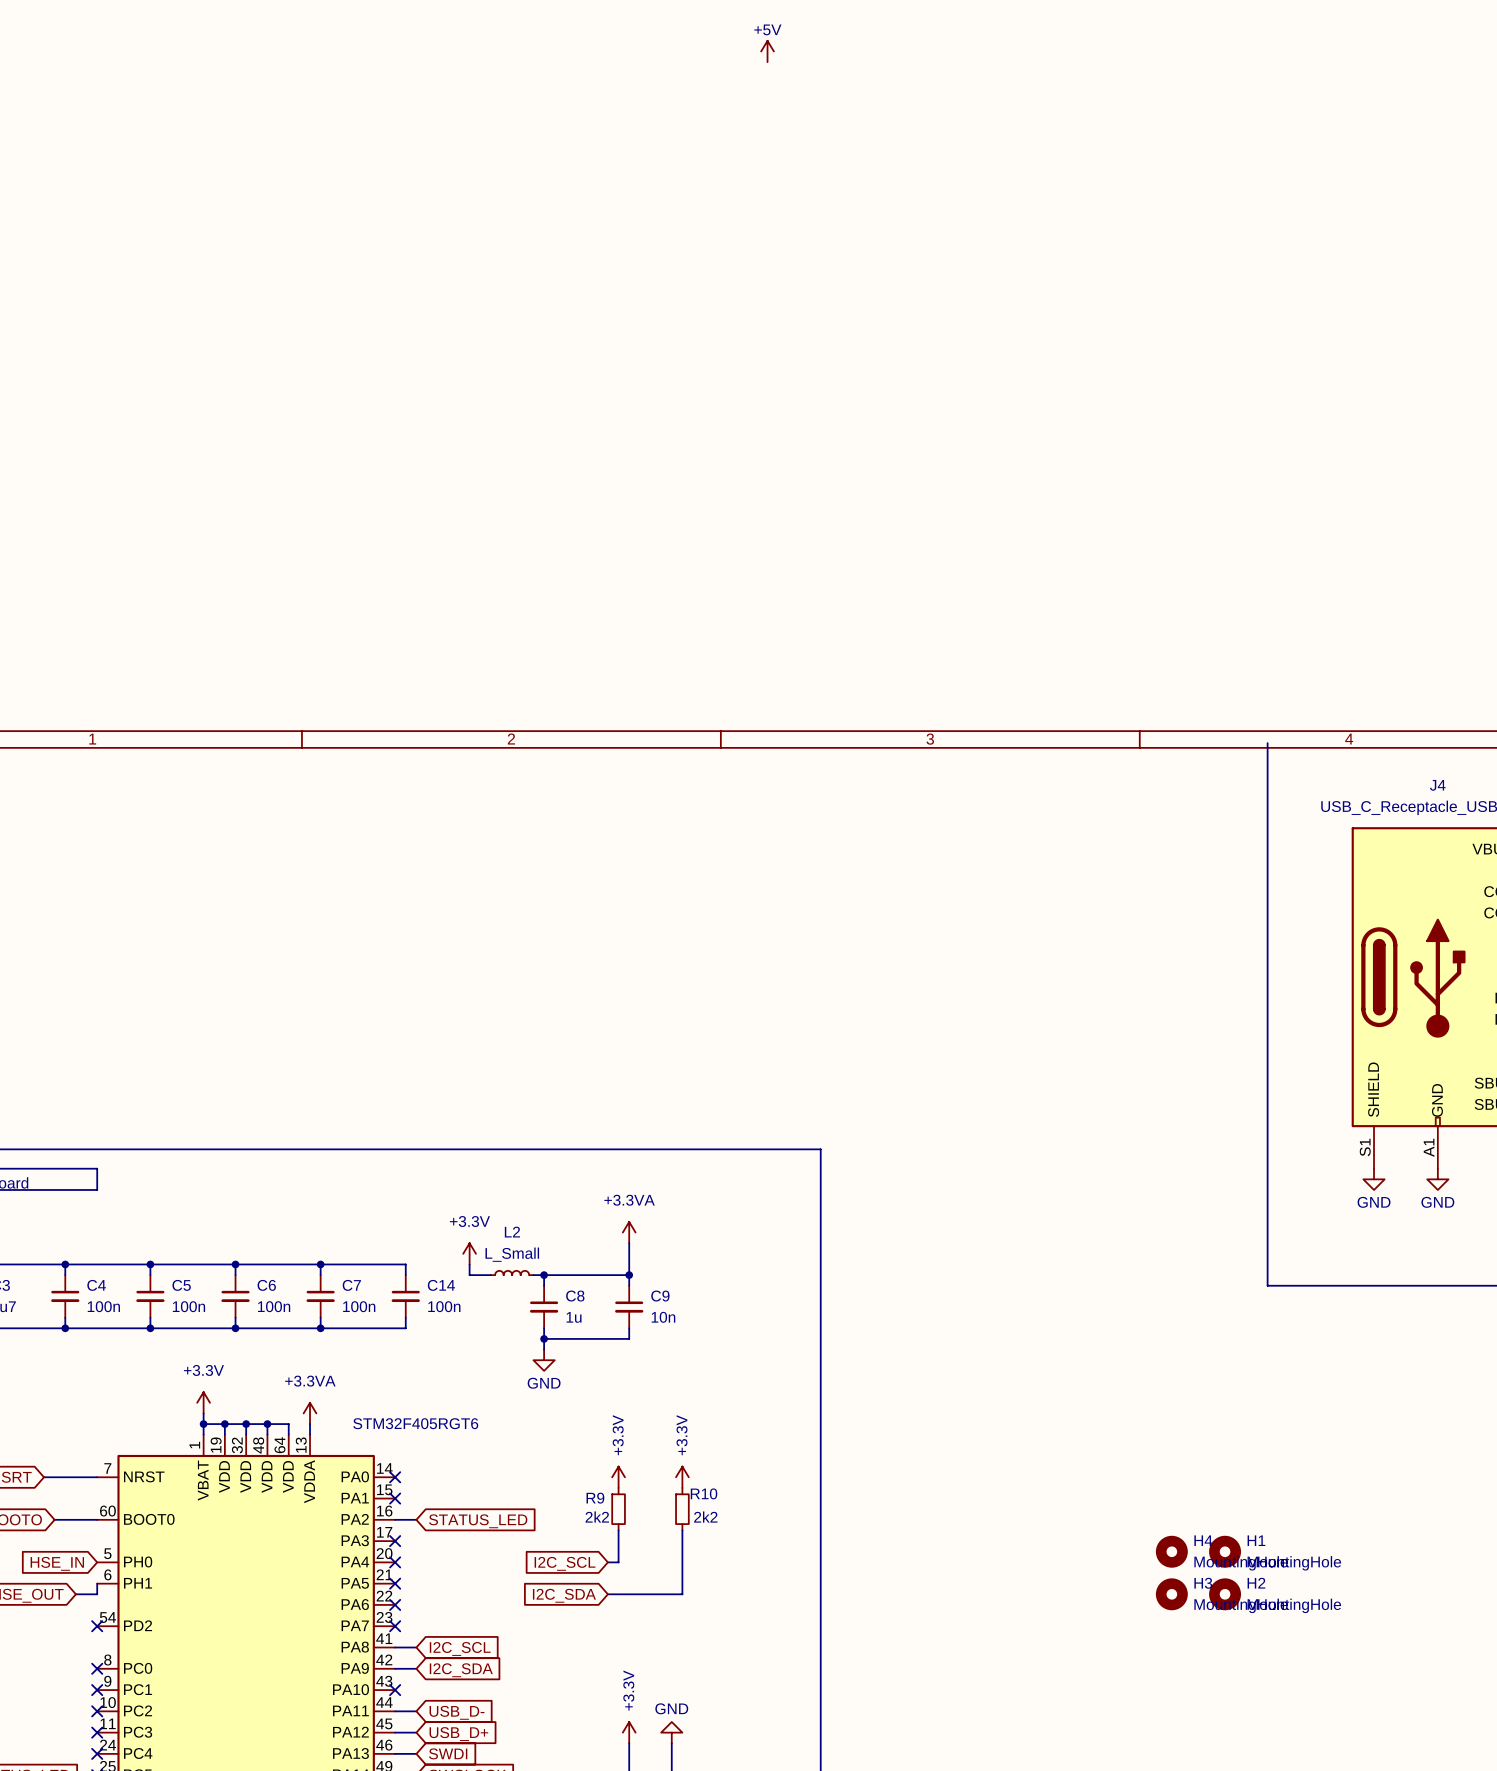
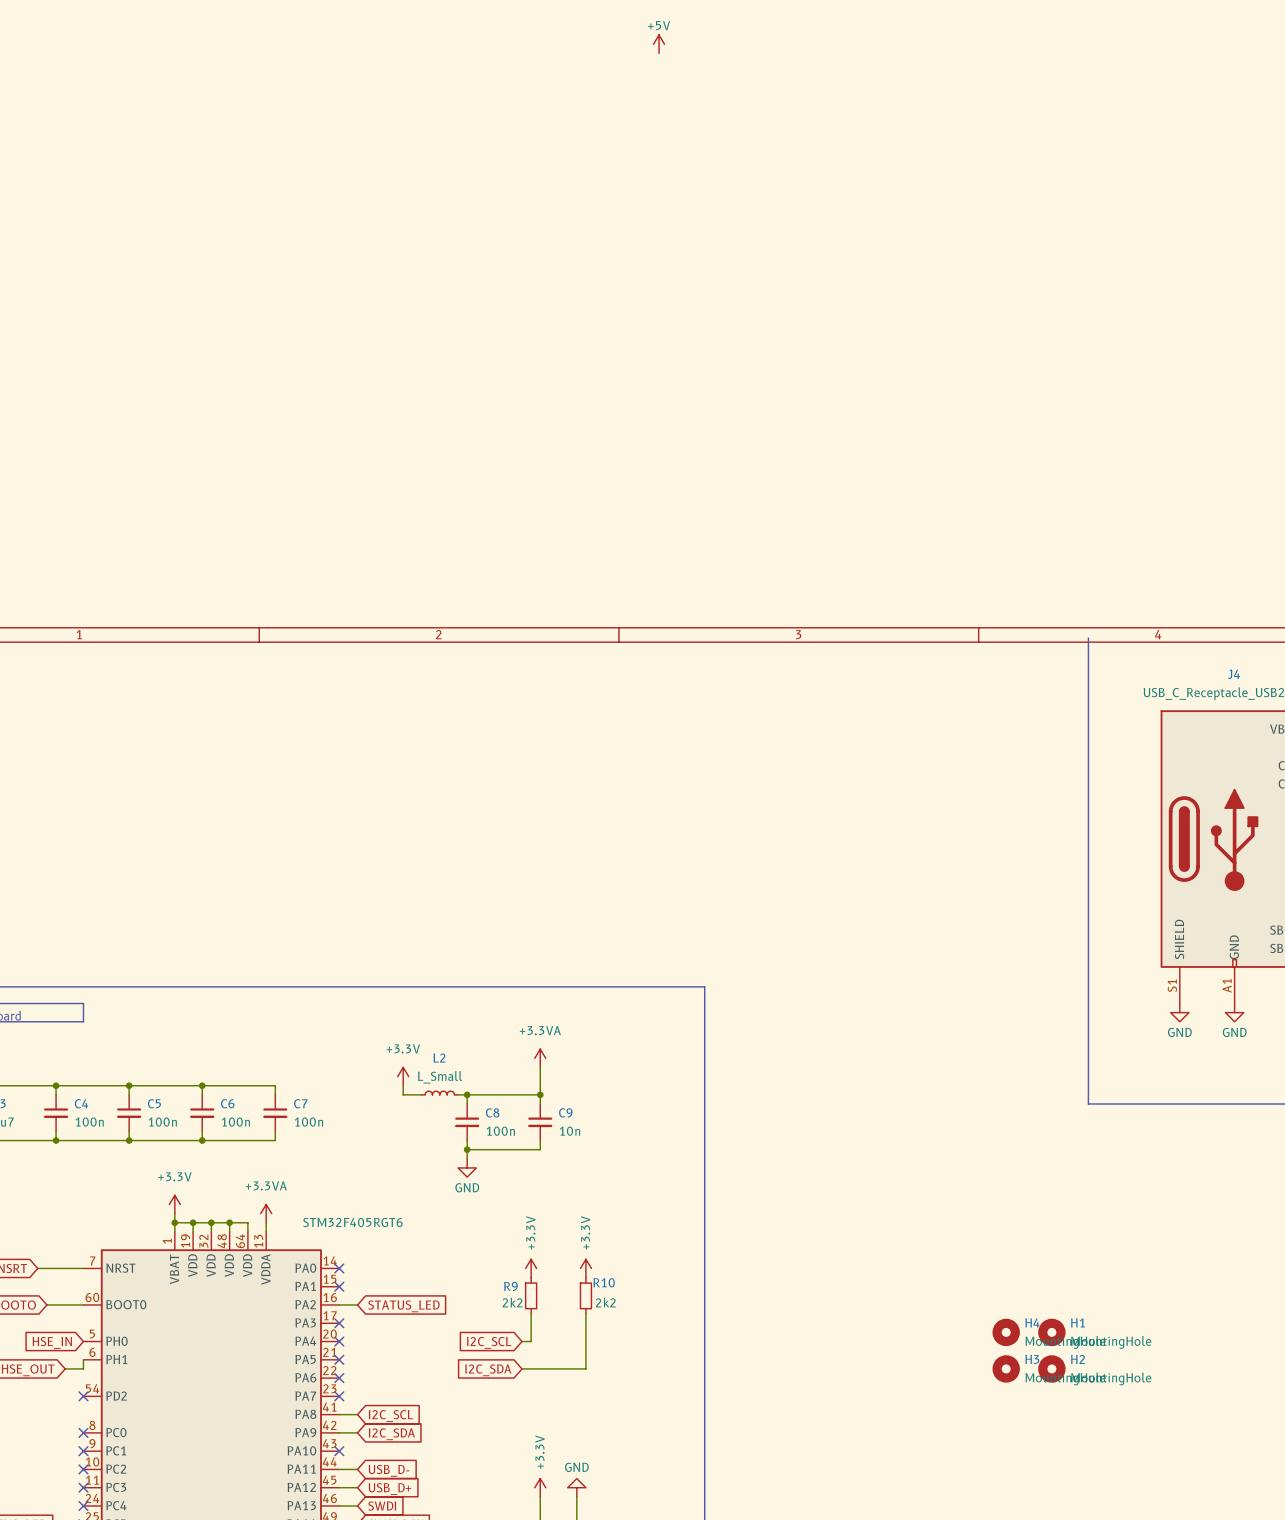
wire: (320, 1264) (405, 1264) (405, 1275) -> none
junction: (320, 1264) -> none
C14: 100n (405, 1296) -> none
wire: (405, 1317) (405, 1328) (320, 1328) -> none
C8 value: 1u (574, 1317) -> 100n (500, 1131)
junction: (320, 1328) -> none

